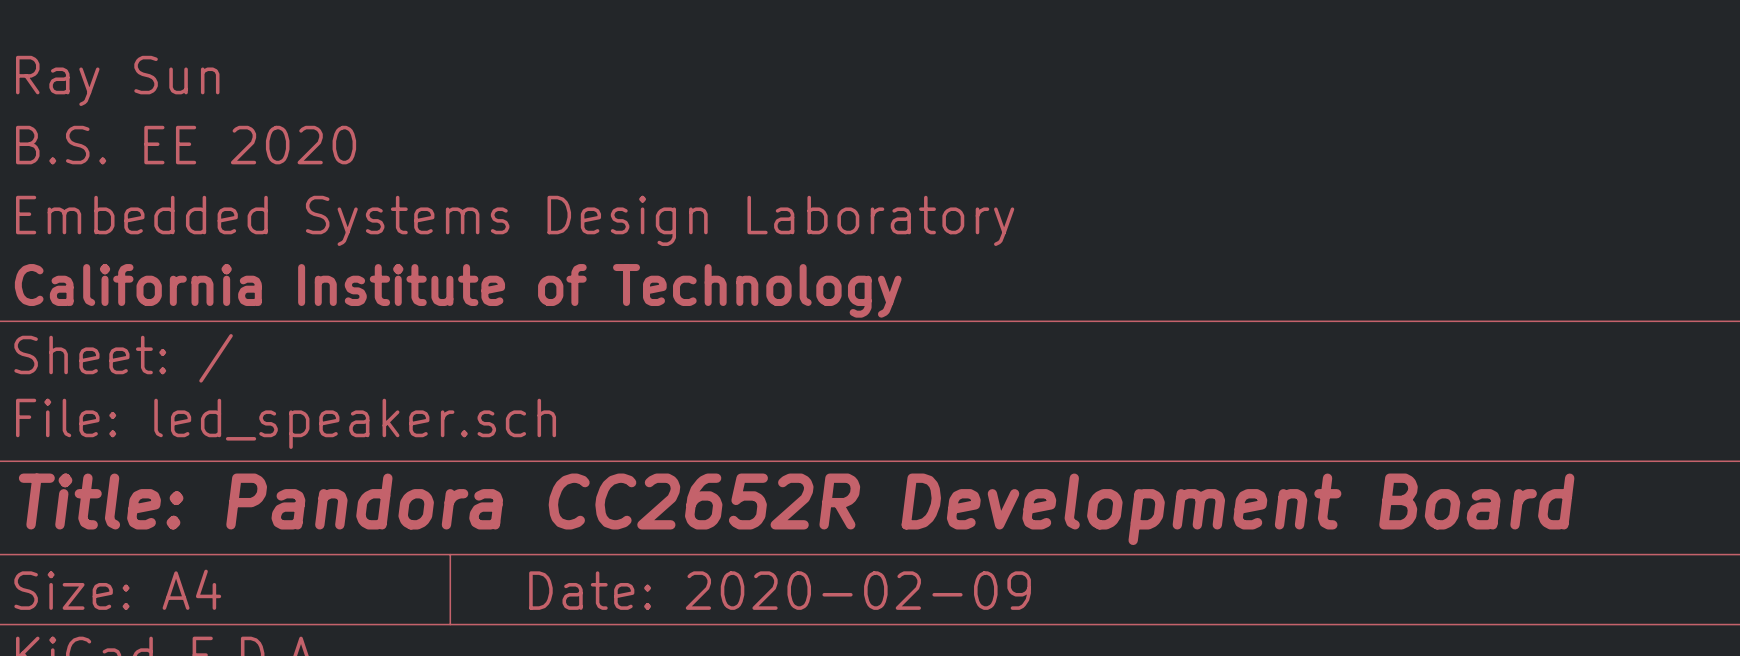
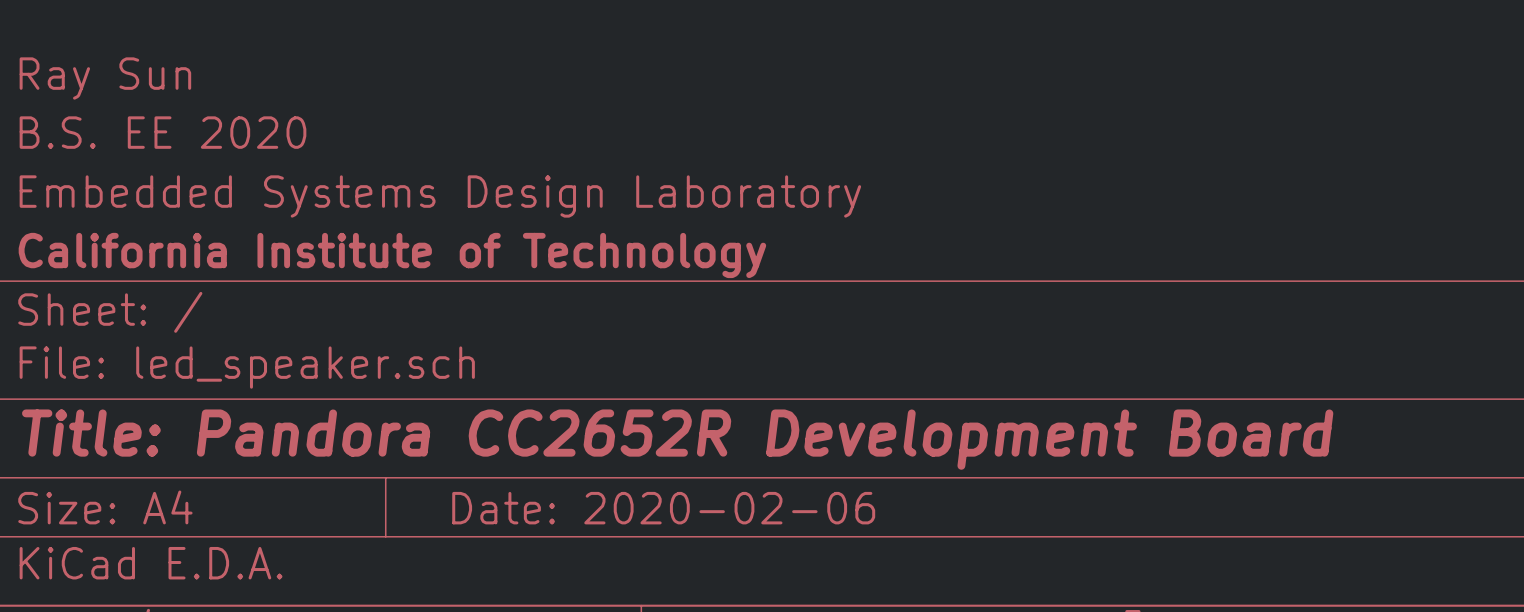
title block: Date: 2020-02-09 (780, 590) -> Date: 2020-02-06 (663, 508)

